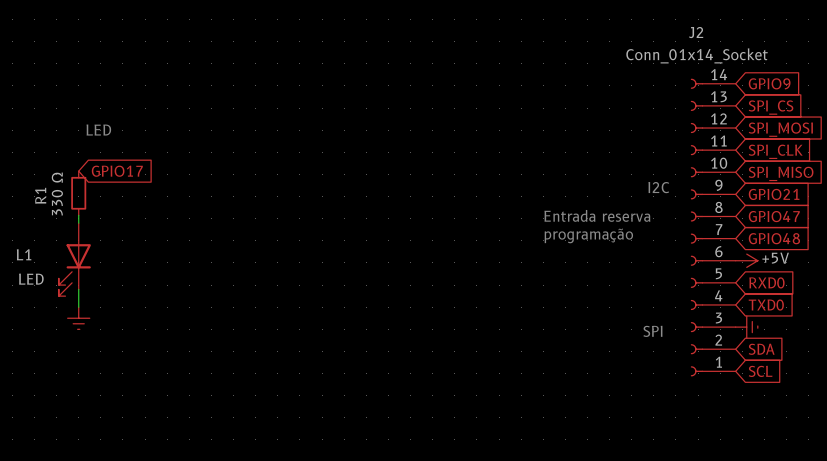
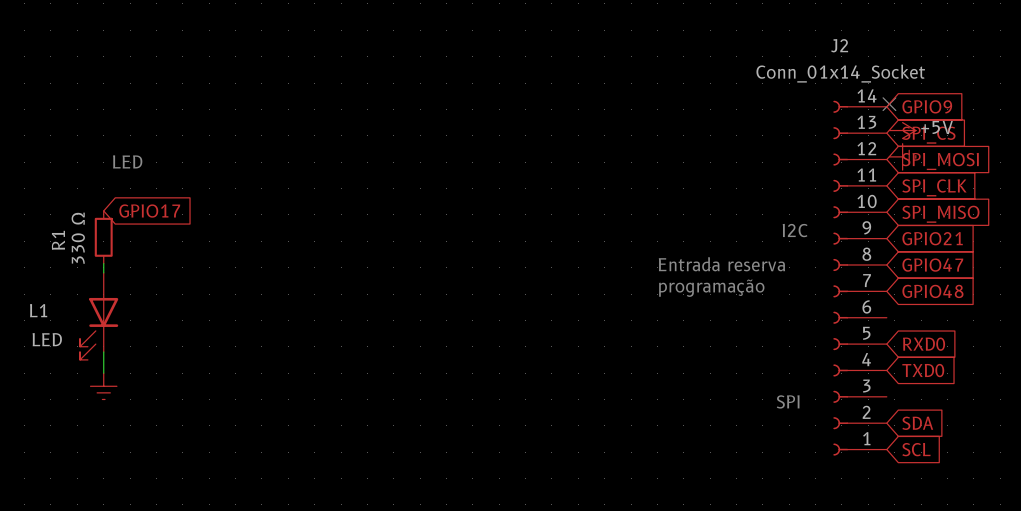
no-connect mark: none -> (889, 104)
power symbol position: +5V (746, 260) -> +5V (902, 130)
power symbol position: (746, 327) -> (902, 156)

